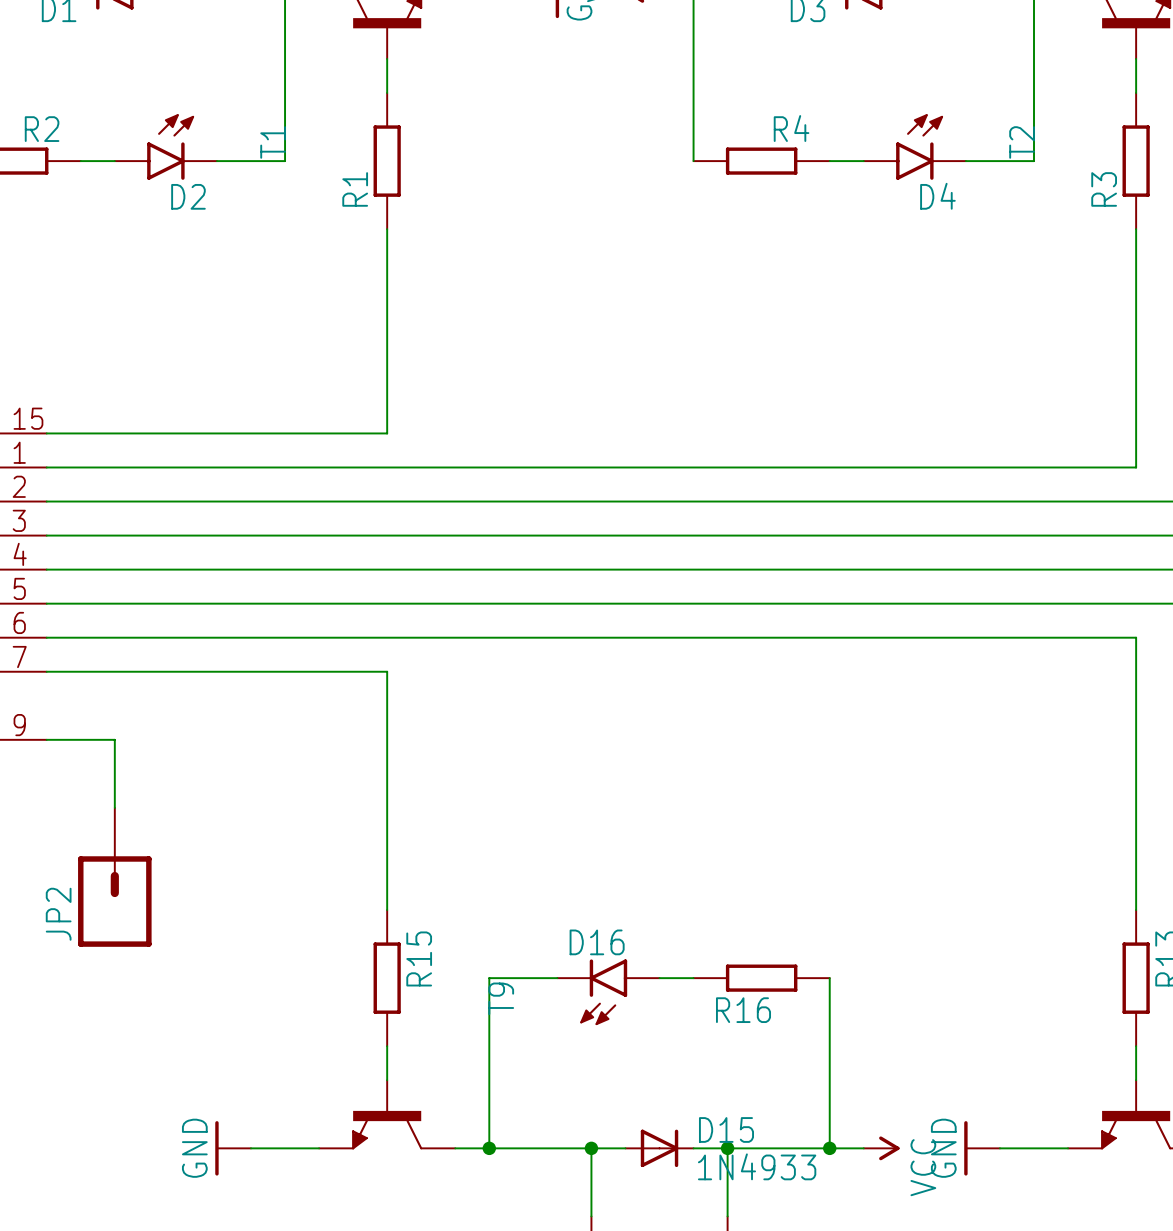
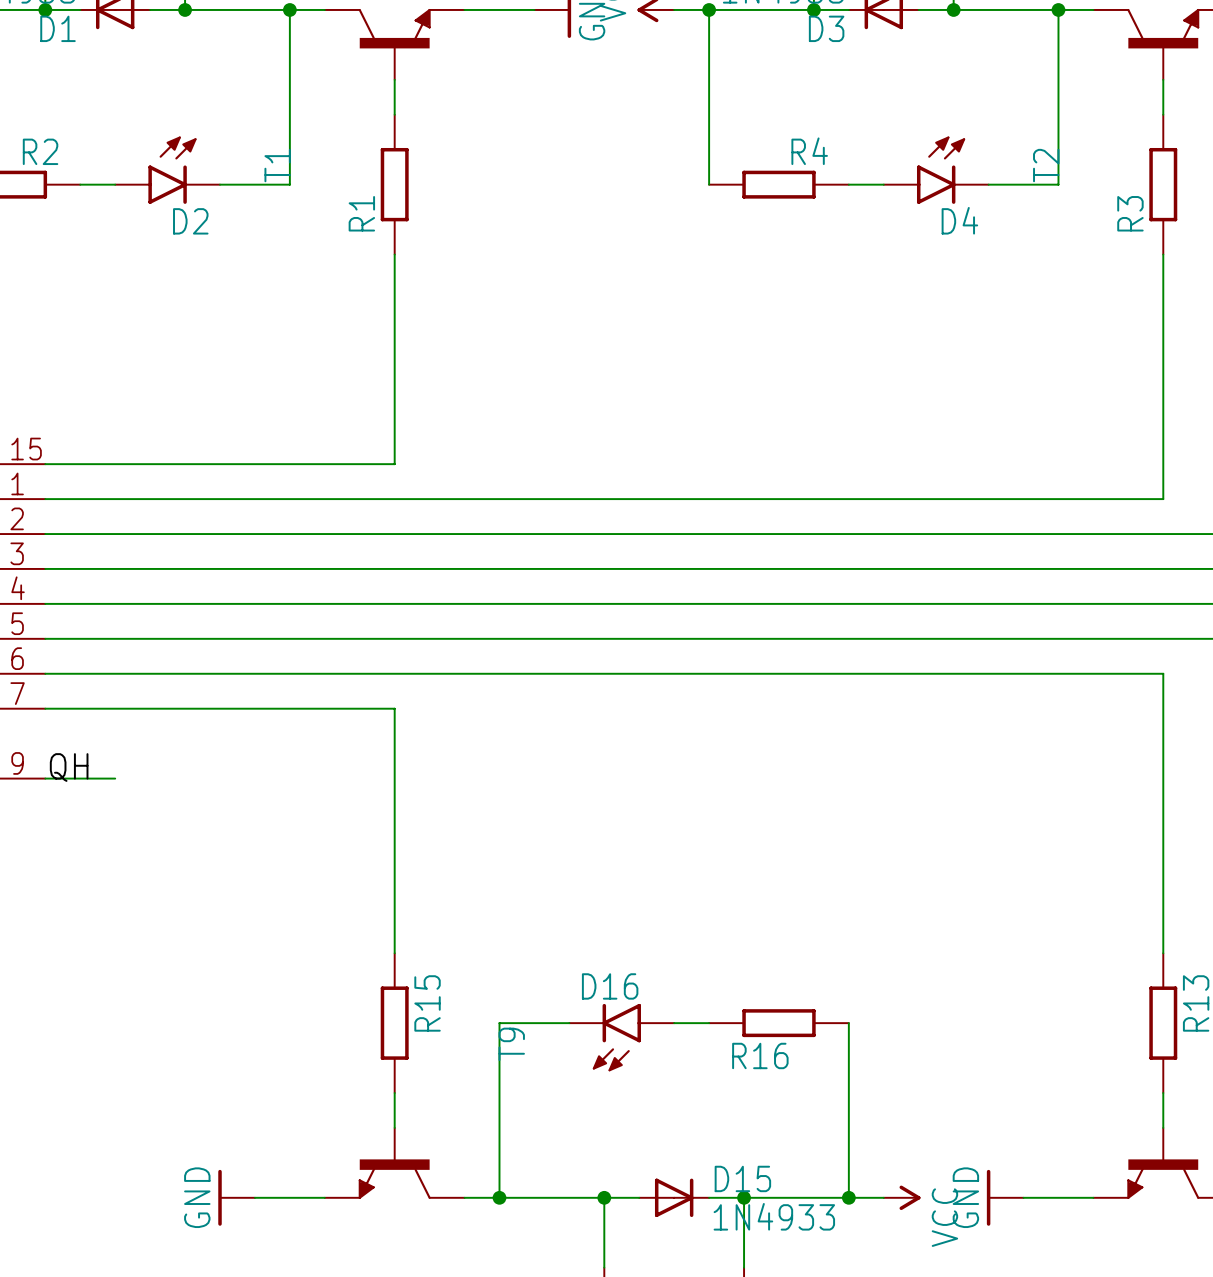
label: none -> QH (69, 767)
wire: (114, 739) (114, 807) -> none
JP2: (114, 877) -> none

